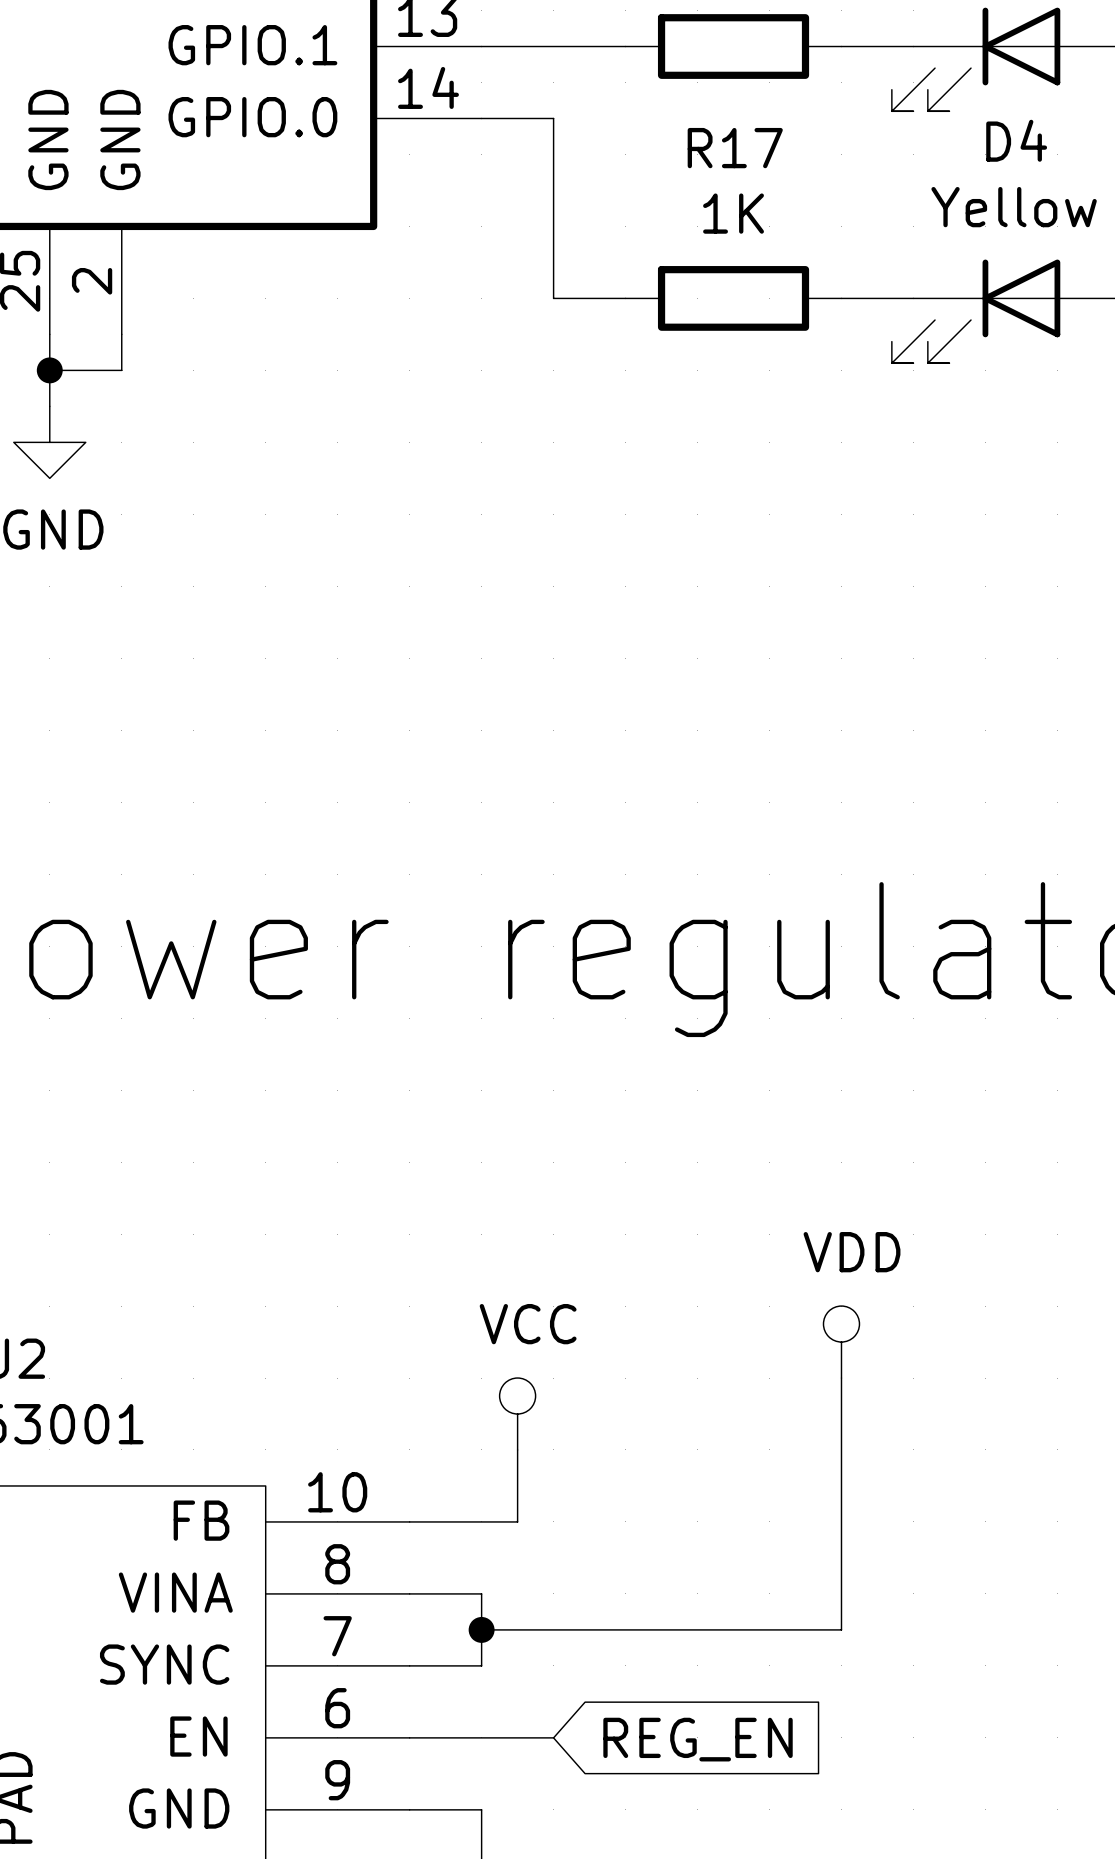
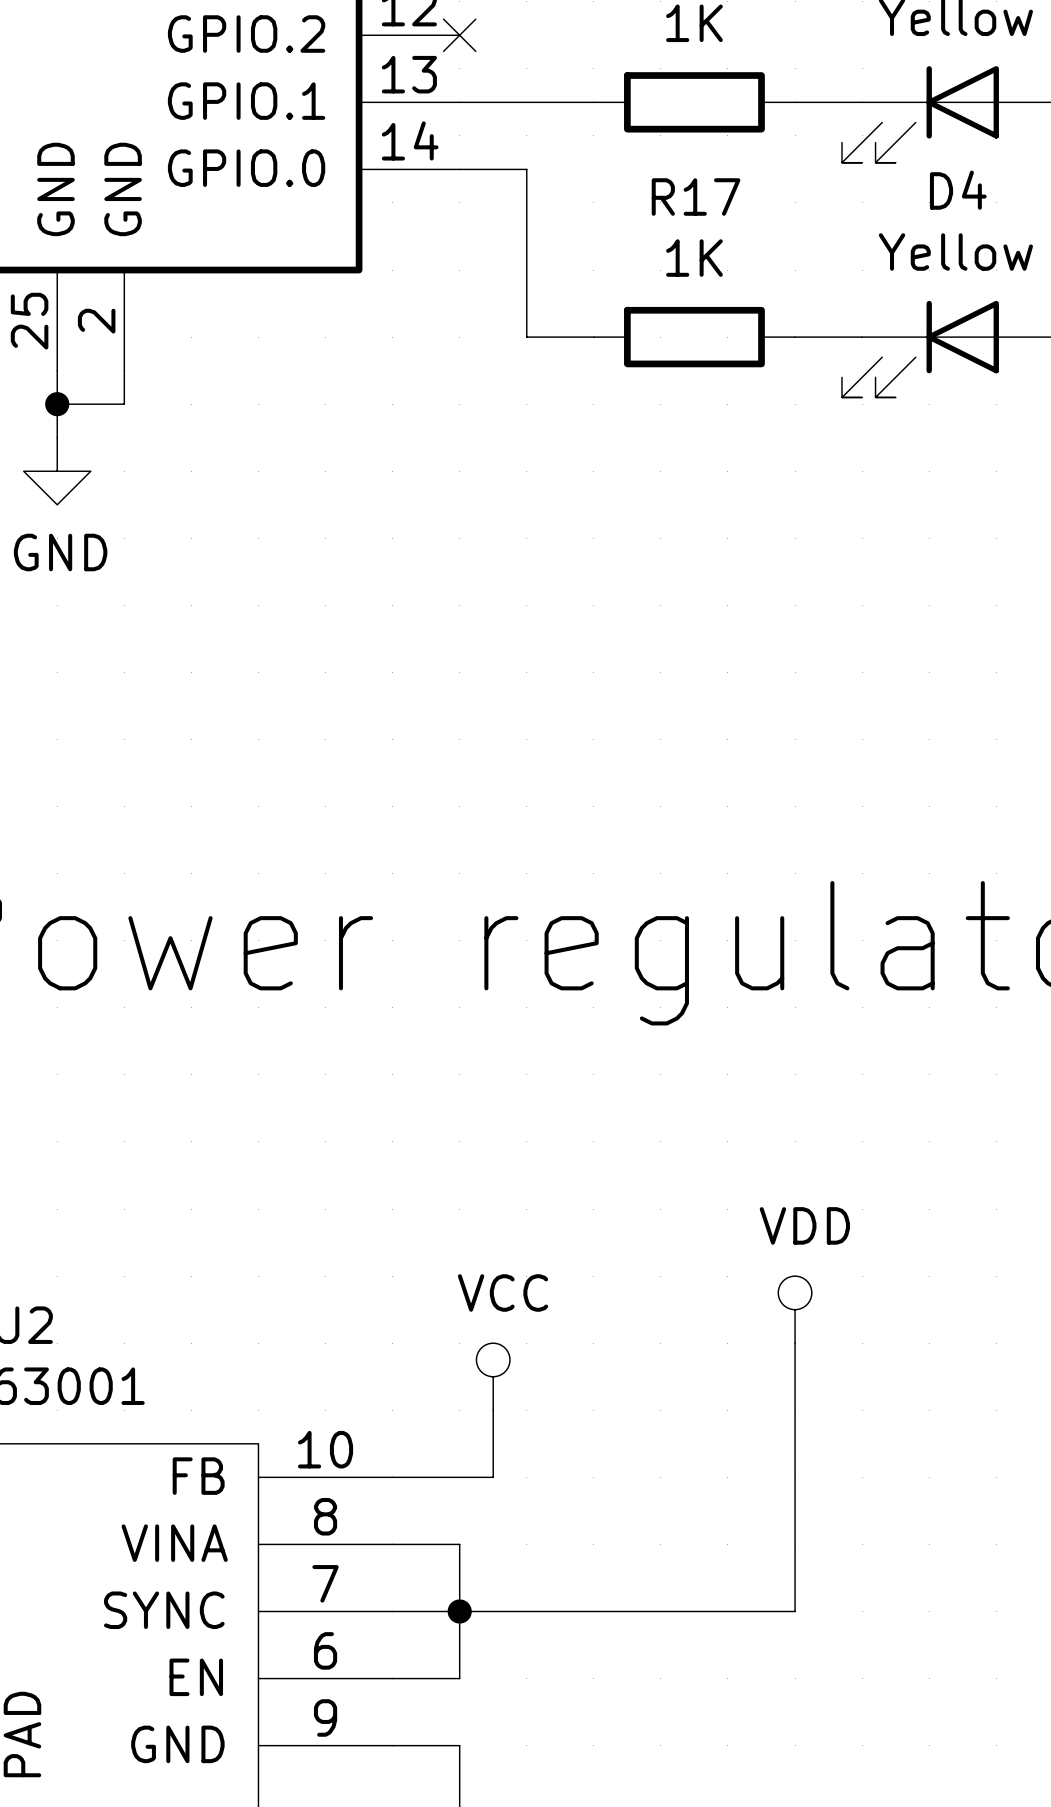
wire: (481, 1629) (841, 1629) -> (459, 1678) (459, 1611) (795, 1611) (795, 1577)
junction position: (481, 1629) -> (459, 1611)
wire: (481, 1737) (553, 1737) -> none
global label: REG_EN (698, 1739) -> none

